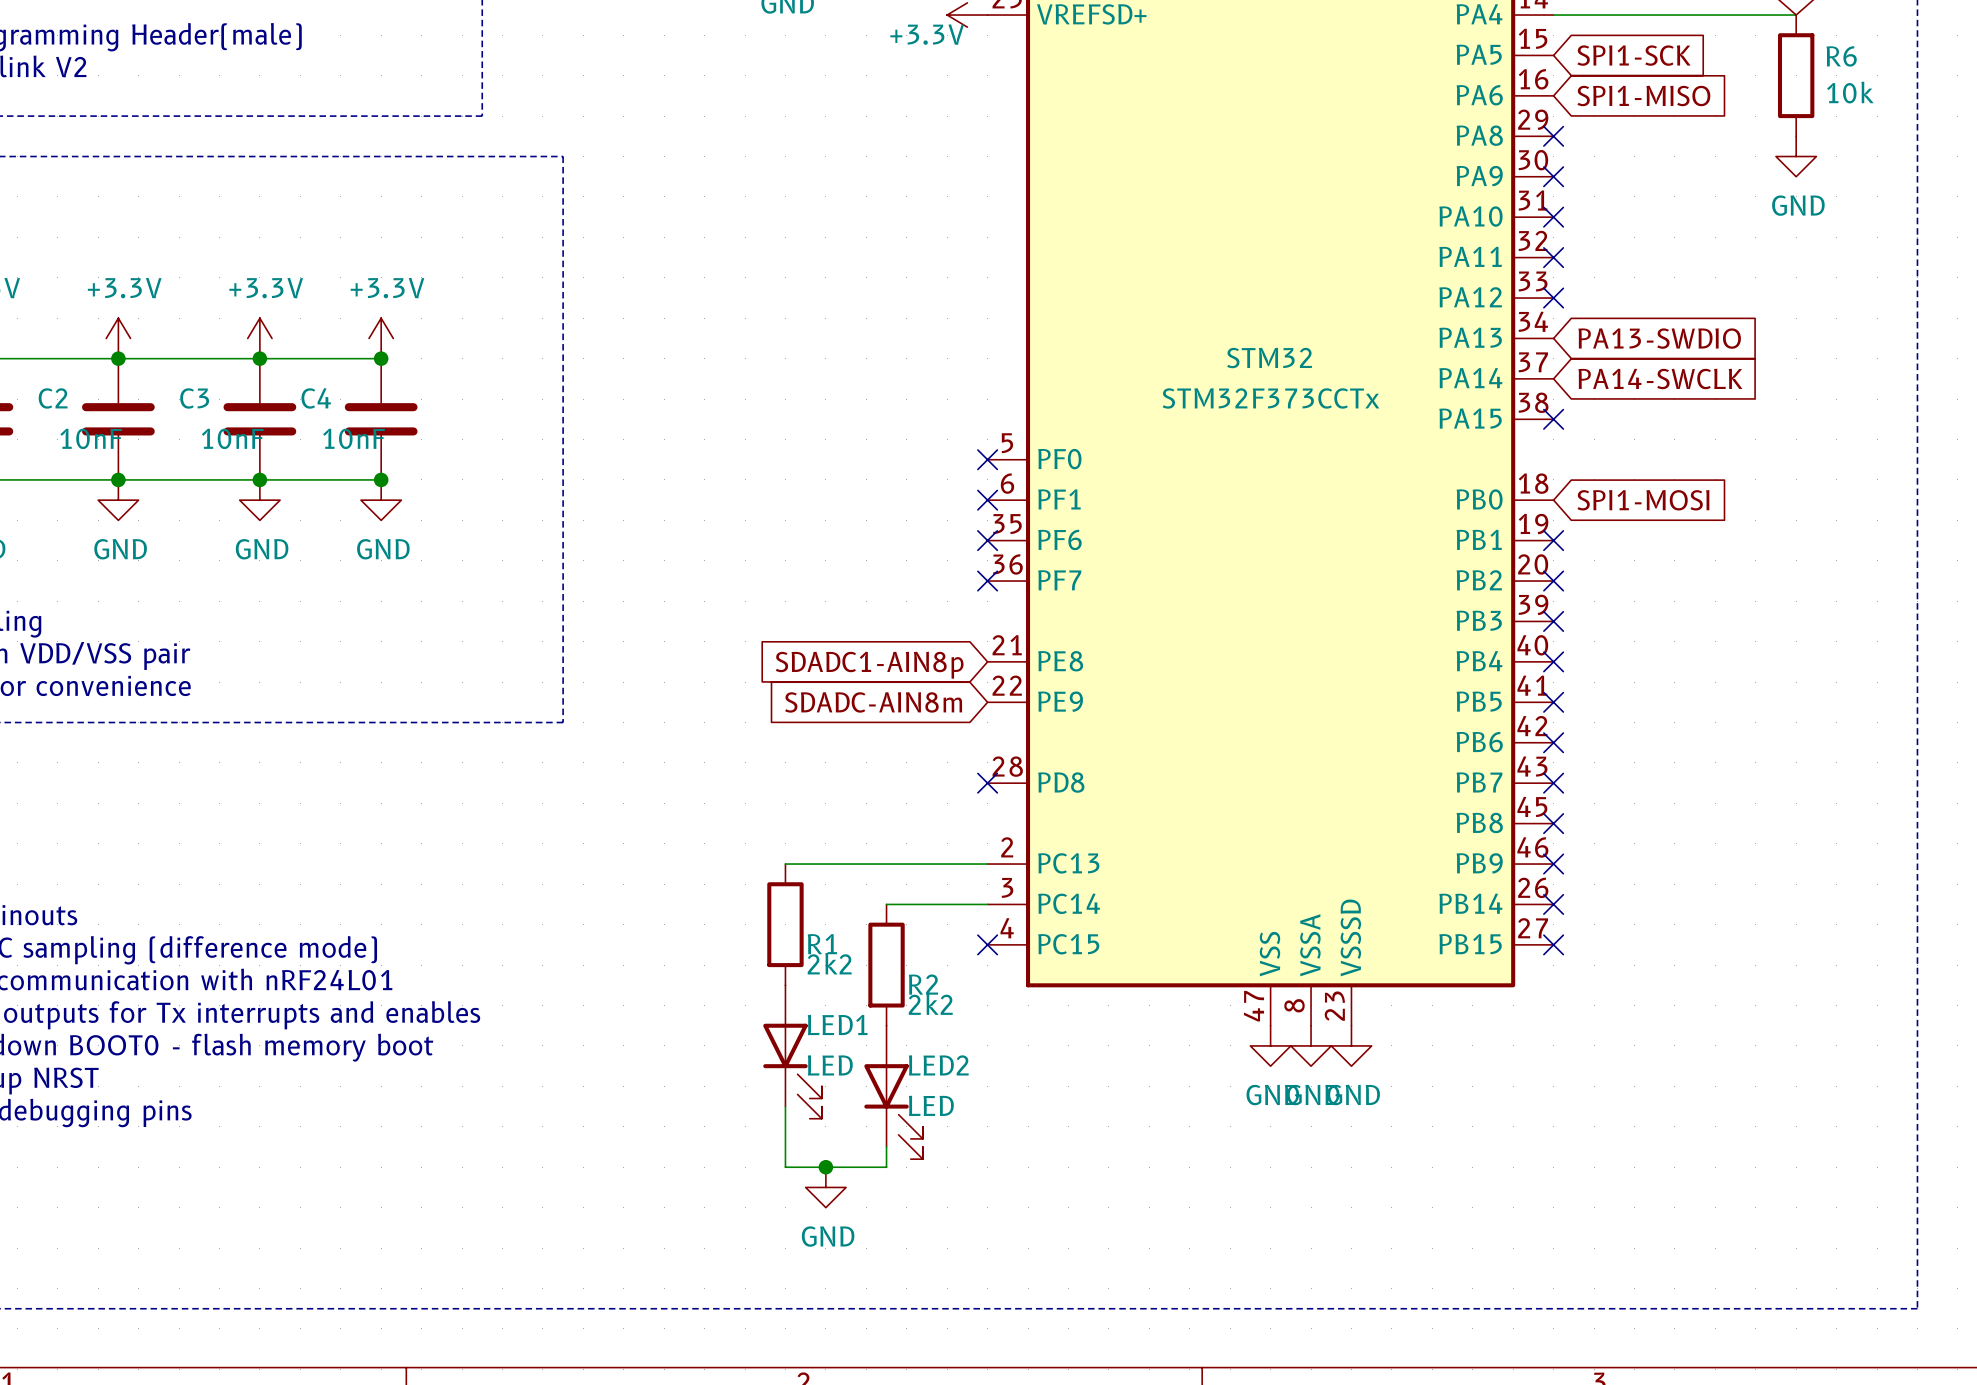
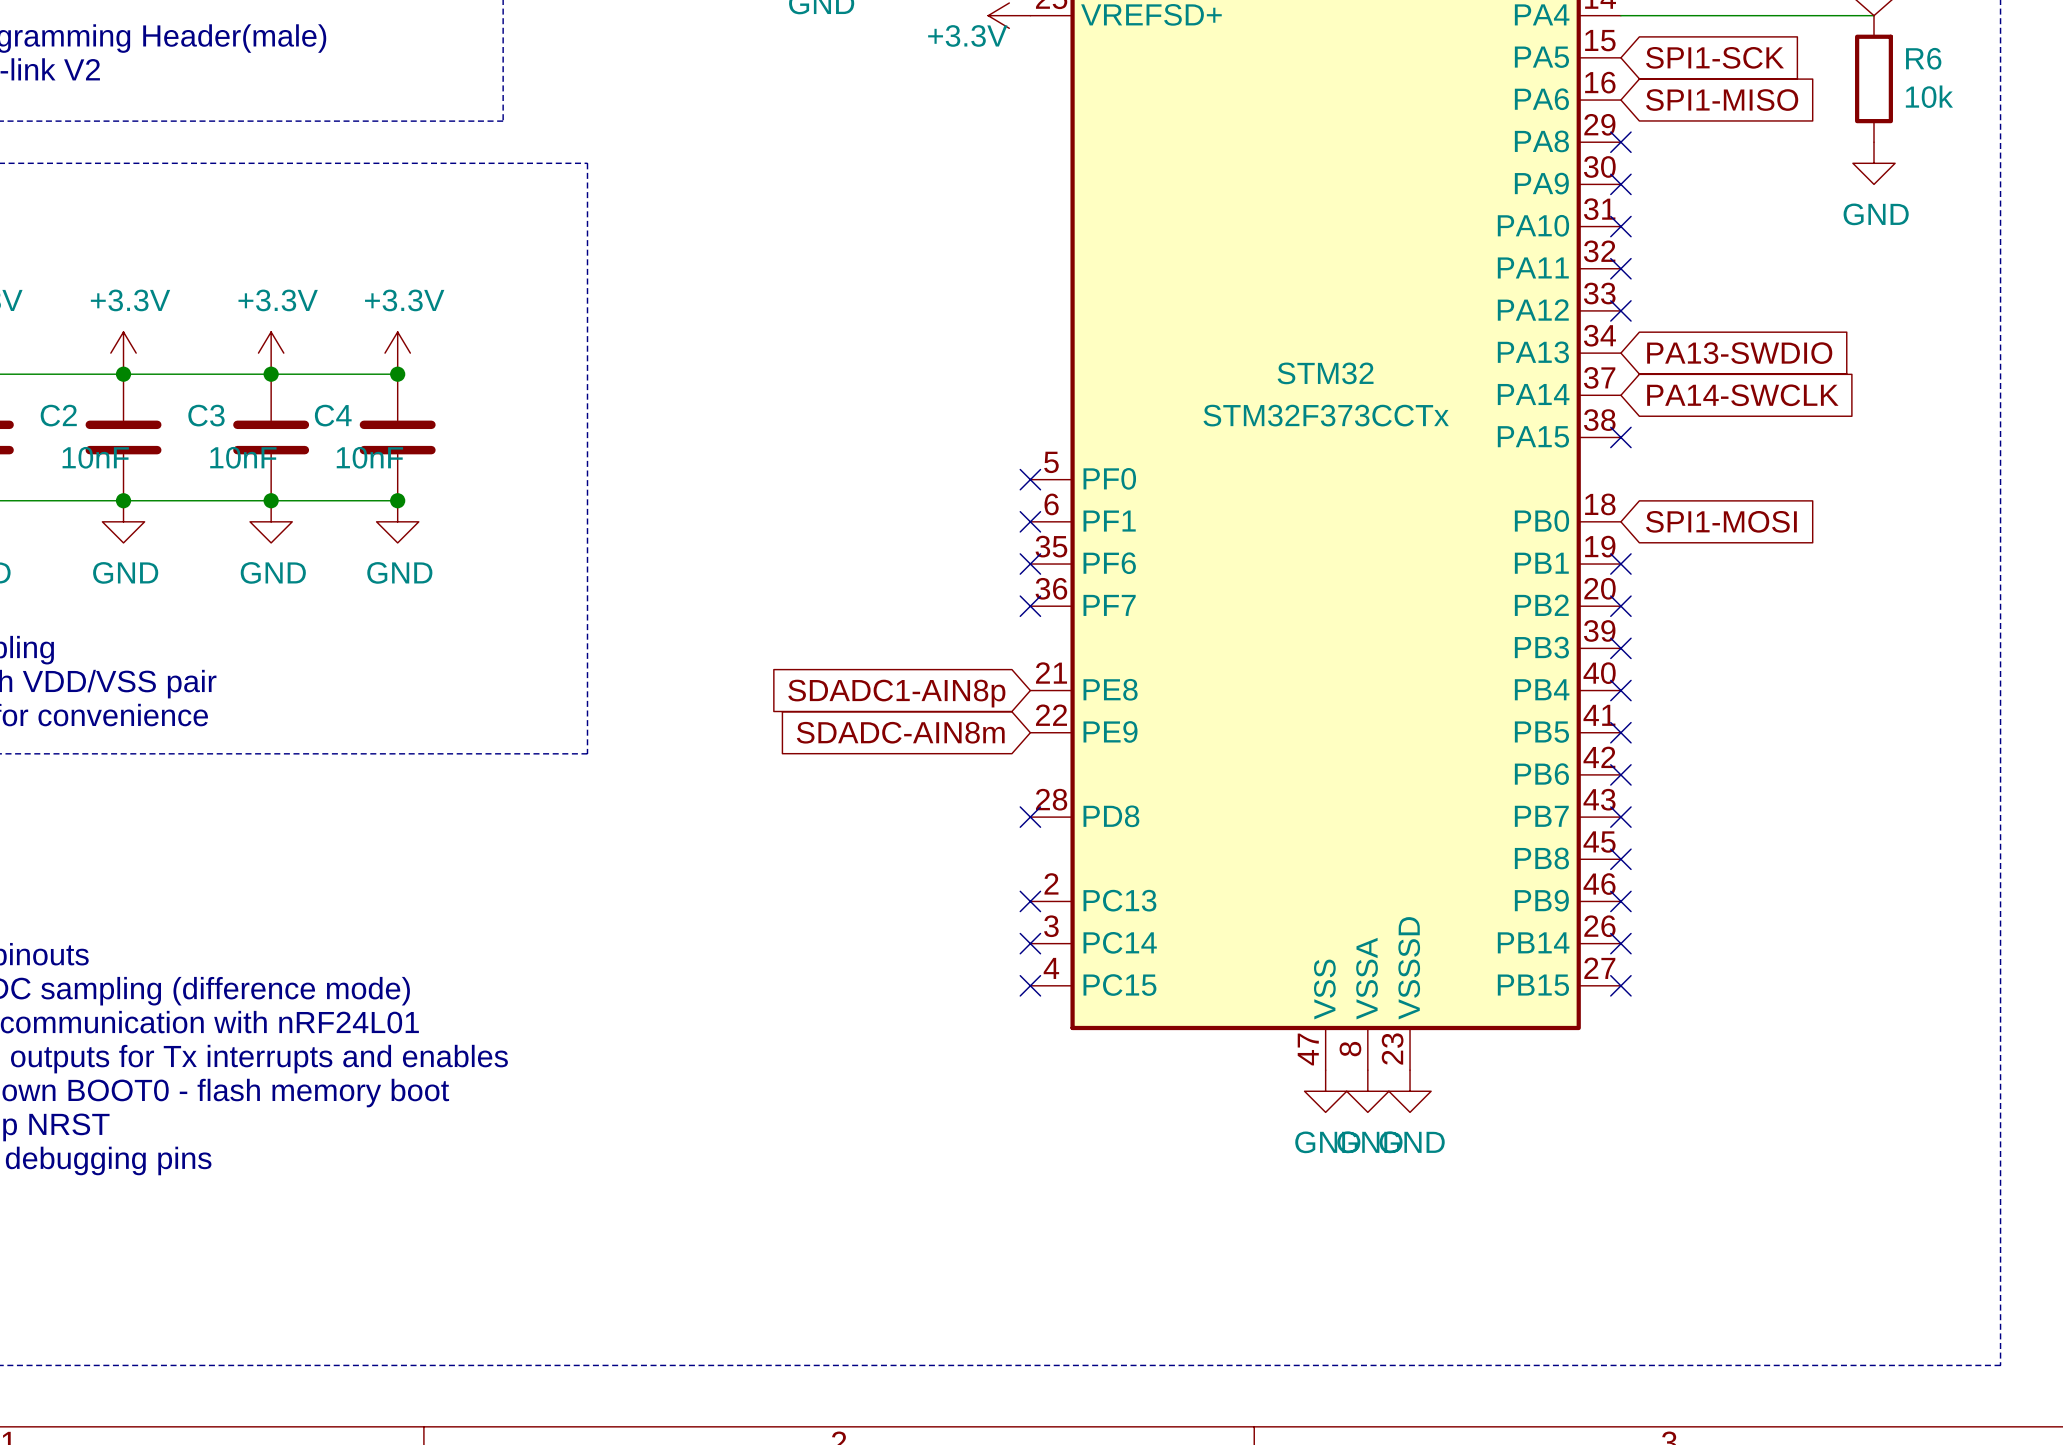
wire: (785, 864) (987, 864) -> none
no-connect mark: none -> (1030, 901)
wire: (886, 904) (987, 904) -> none
no-connect mark: none -> (1030, 943)
R1: 2k2 (785, 924) -> none
R2: 2k2 (886, 965) -> none
LED1: LED (792, 1052) -> none
LED2: LED (893, 1092) -> none
wire: (785, 1106) (785, 1167) (886, 1167) (886, 1147) -> none
junction: (825, 1167) -> none
power symbol: GND (825, 1187) -> none

